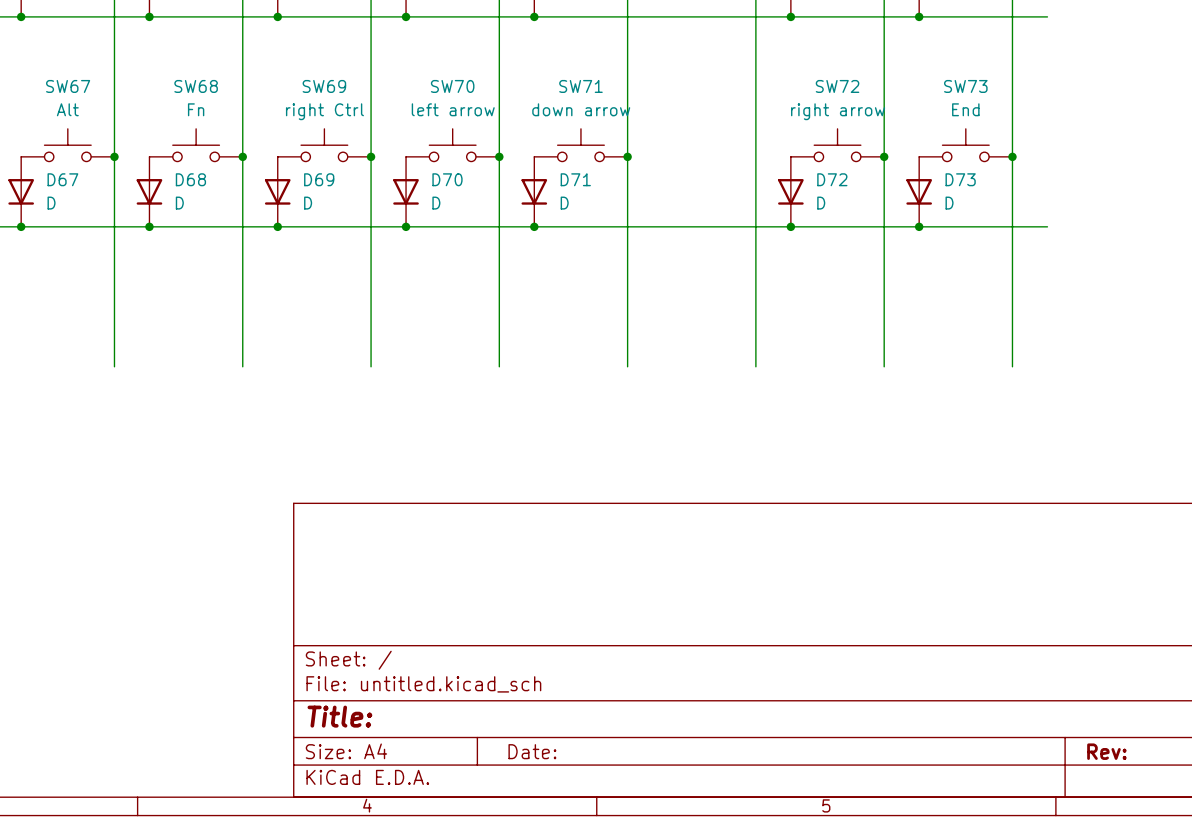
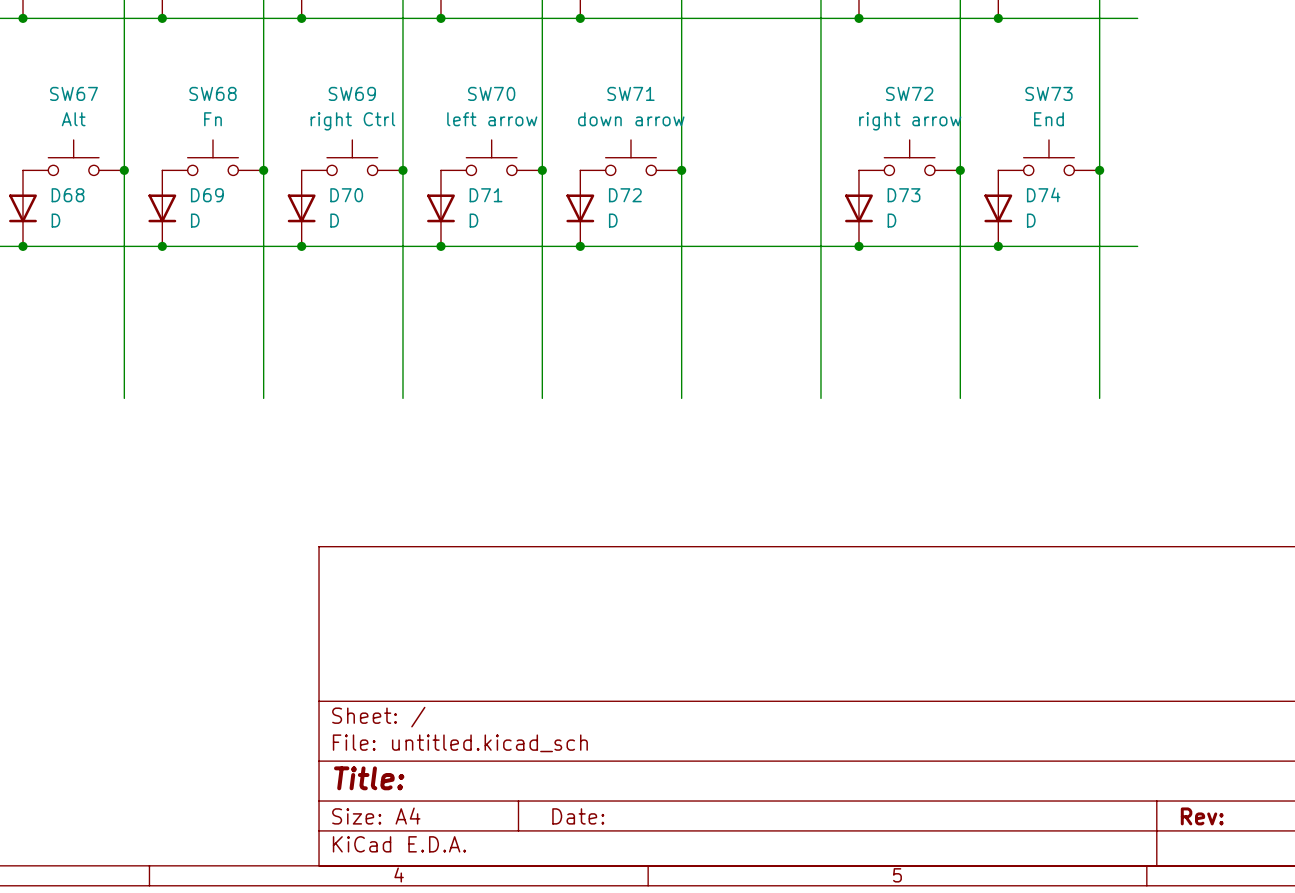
D67 name: D67 (62, 179) -> D68 (68, 195)
D68 name: D68 (190, 179) -> D69 (207, 195)
D69 name: D69 (319, 179) -> D70 (346, 195)
D70 name: D70 (447, 179) -> D71 (486, 195)
D71 name: D71 (575, 179) -> D72 (625, 195)
D72 name: D72 (832, 179) -> D73 (904, 195)
D73 name: D73 (960, 179) -> D74 (1043, 194)

